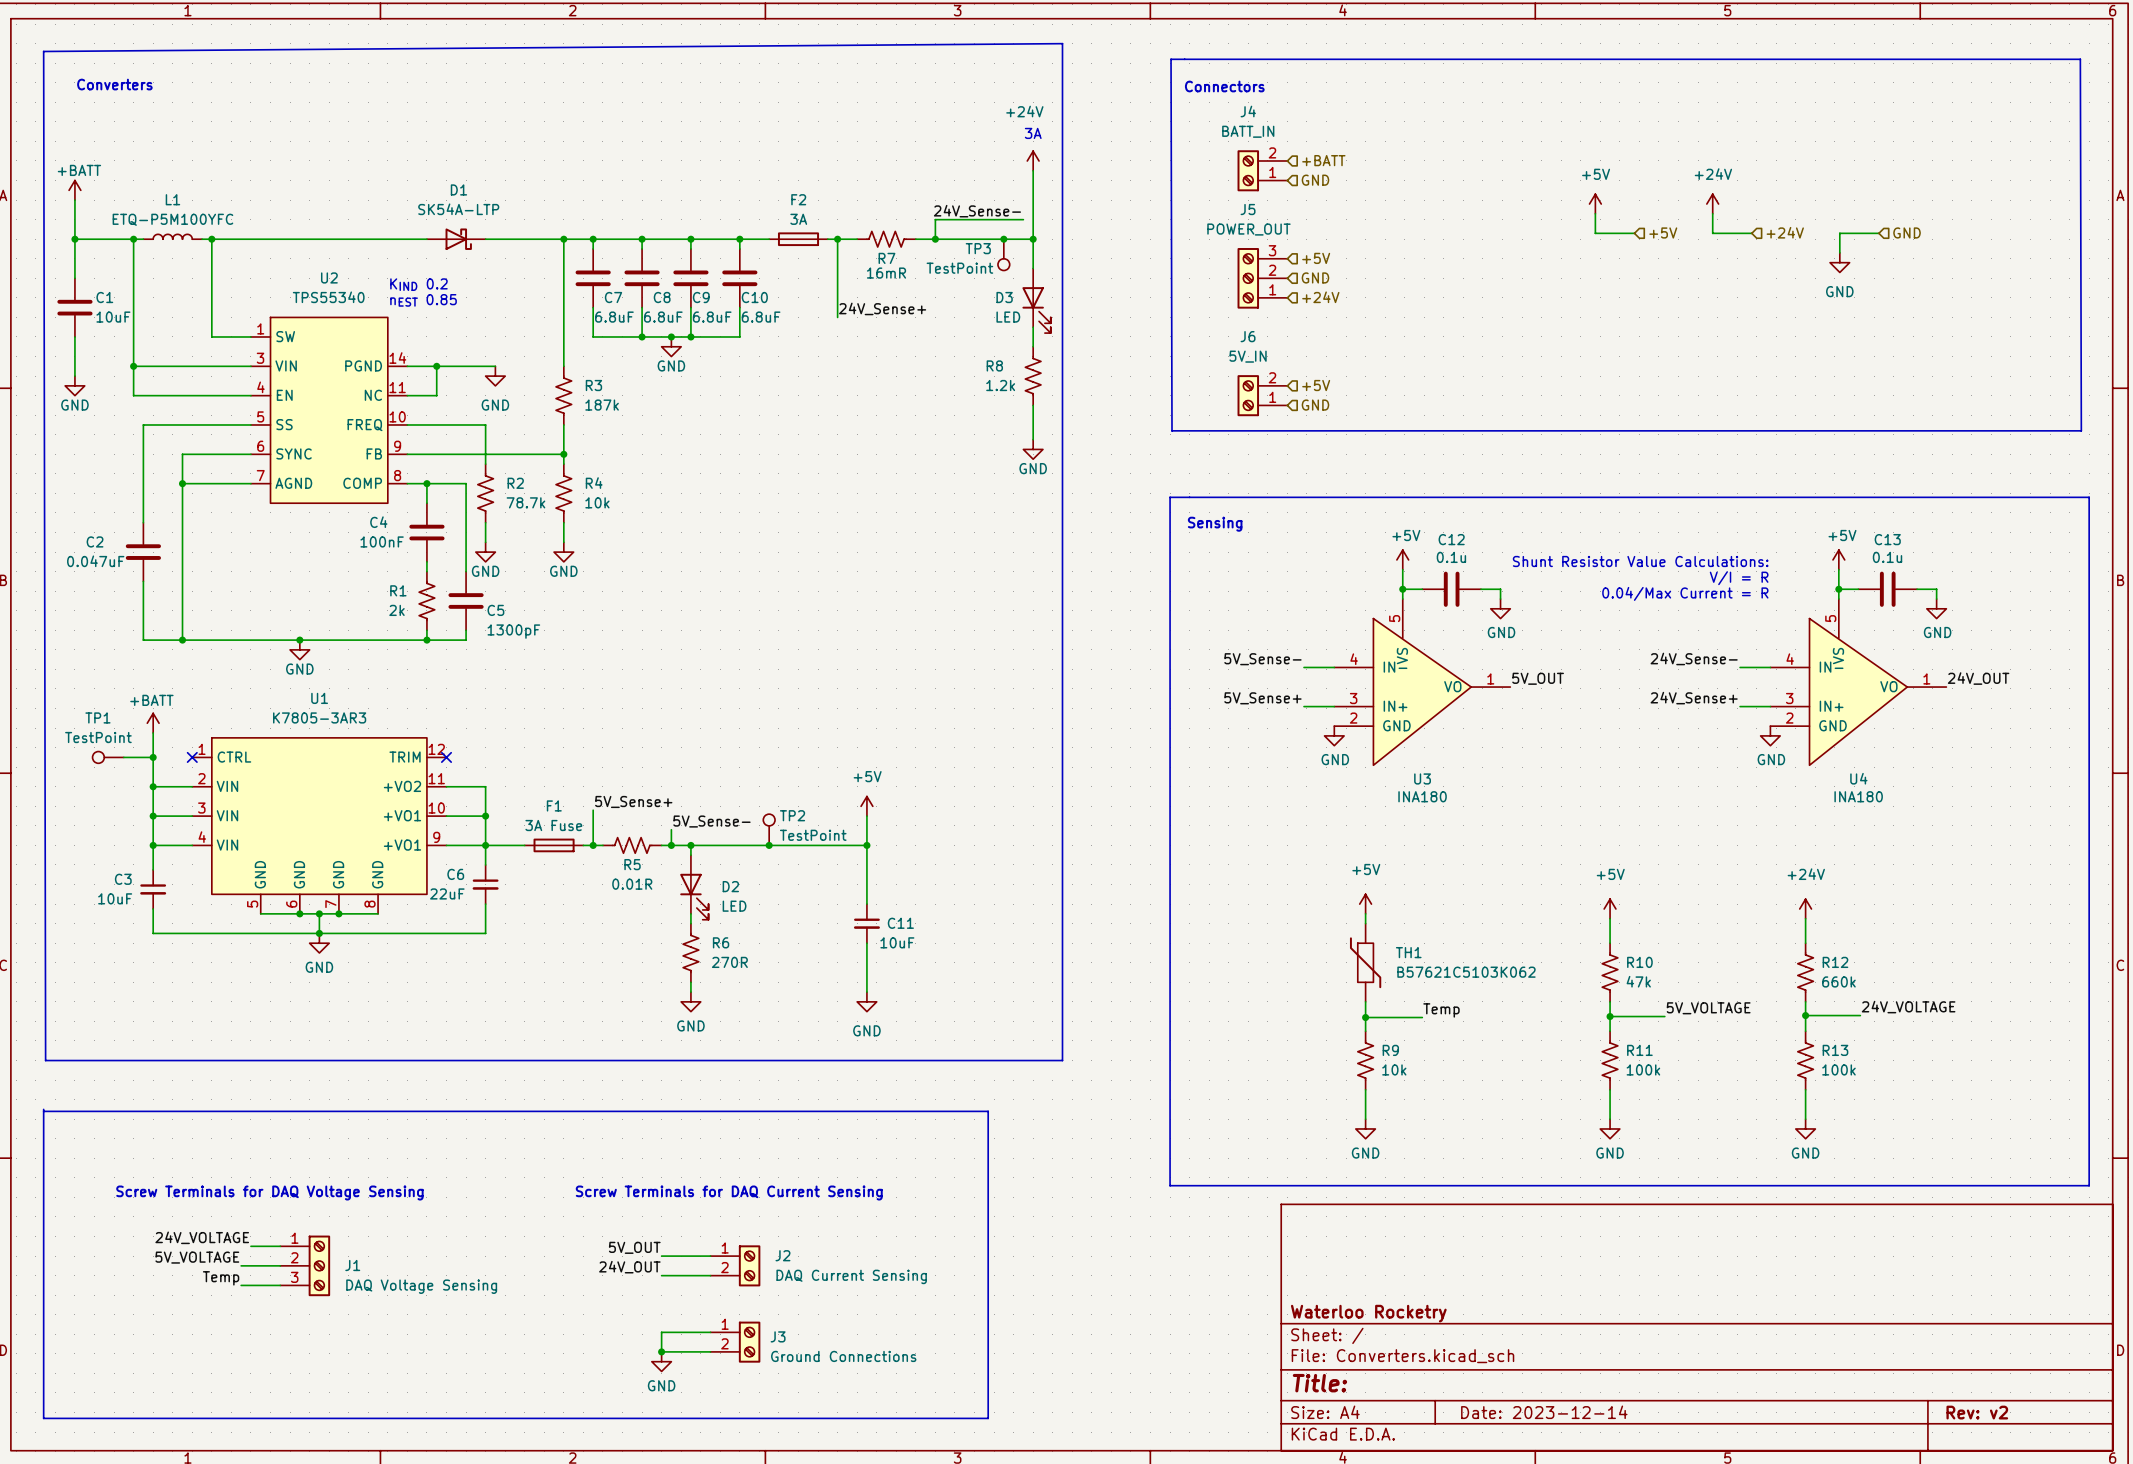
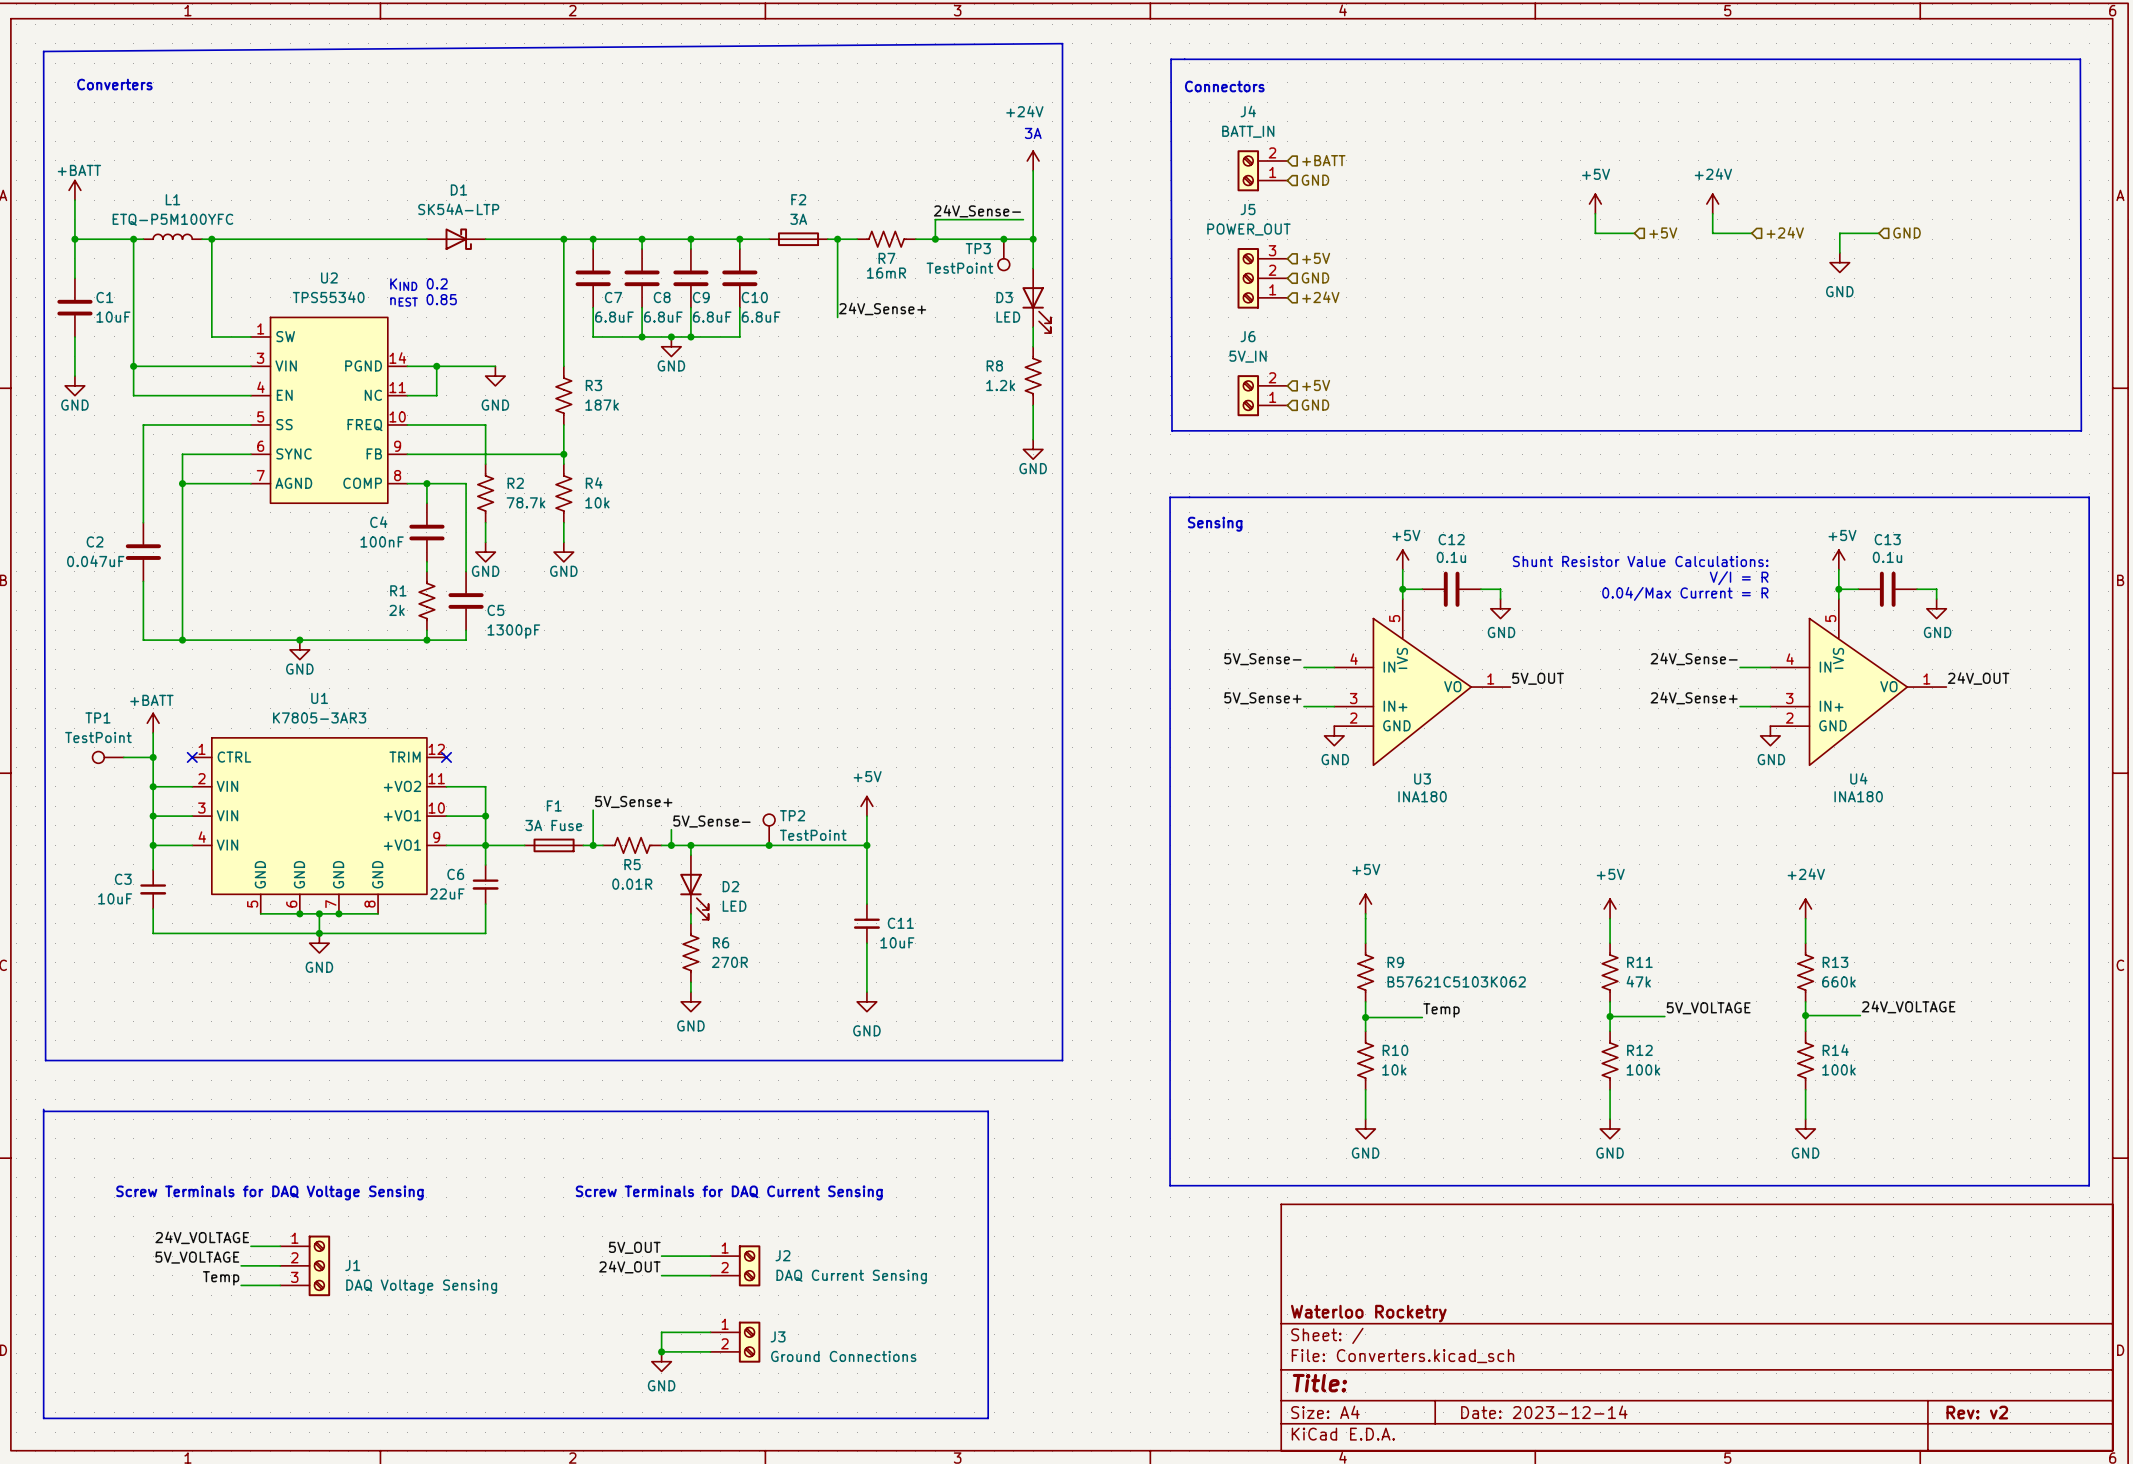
TH1: B57621C5103K062 (1365, 962) -> none
R10 name: R10 (1639, 962) -> R11 (1639, 962)
R12 name: R12 (1835, 962) -> R13 (1835, 962)
R9: none -> B57621C5103K062 (1365, 972)
R9 name: R9 (1390, 1050) -> R10 (1395, 1050)
R11 name: R11 (1639, 1050) -> R12 (1639, 1050)
R13 name: R13 (1835, 1050) -> R14 (1835, 1050)

